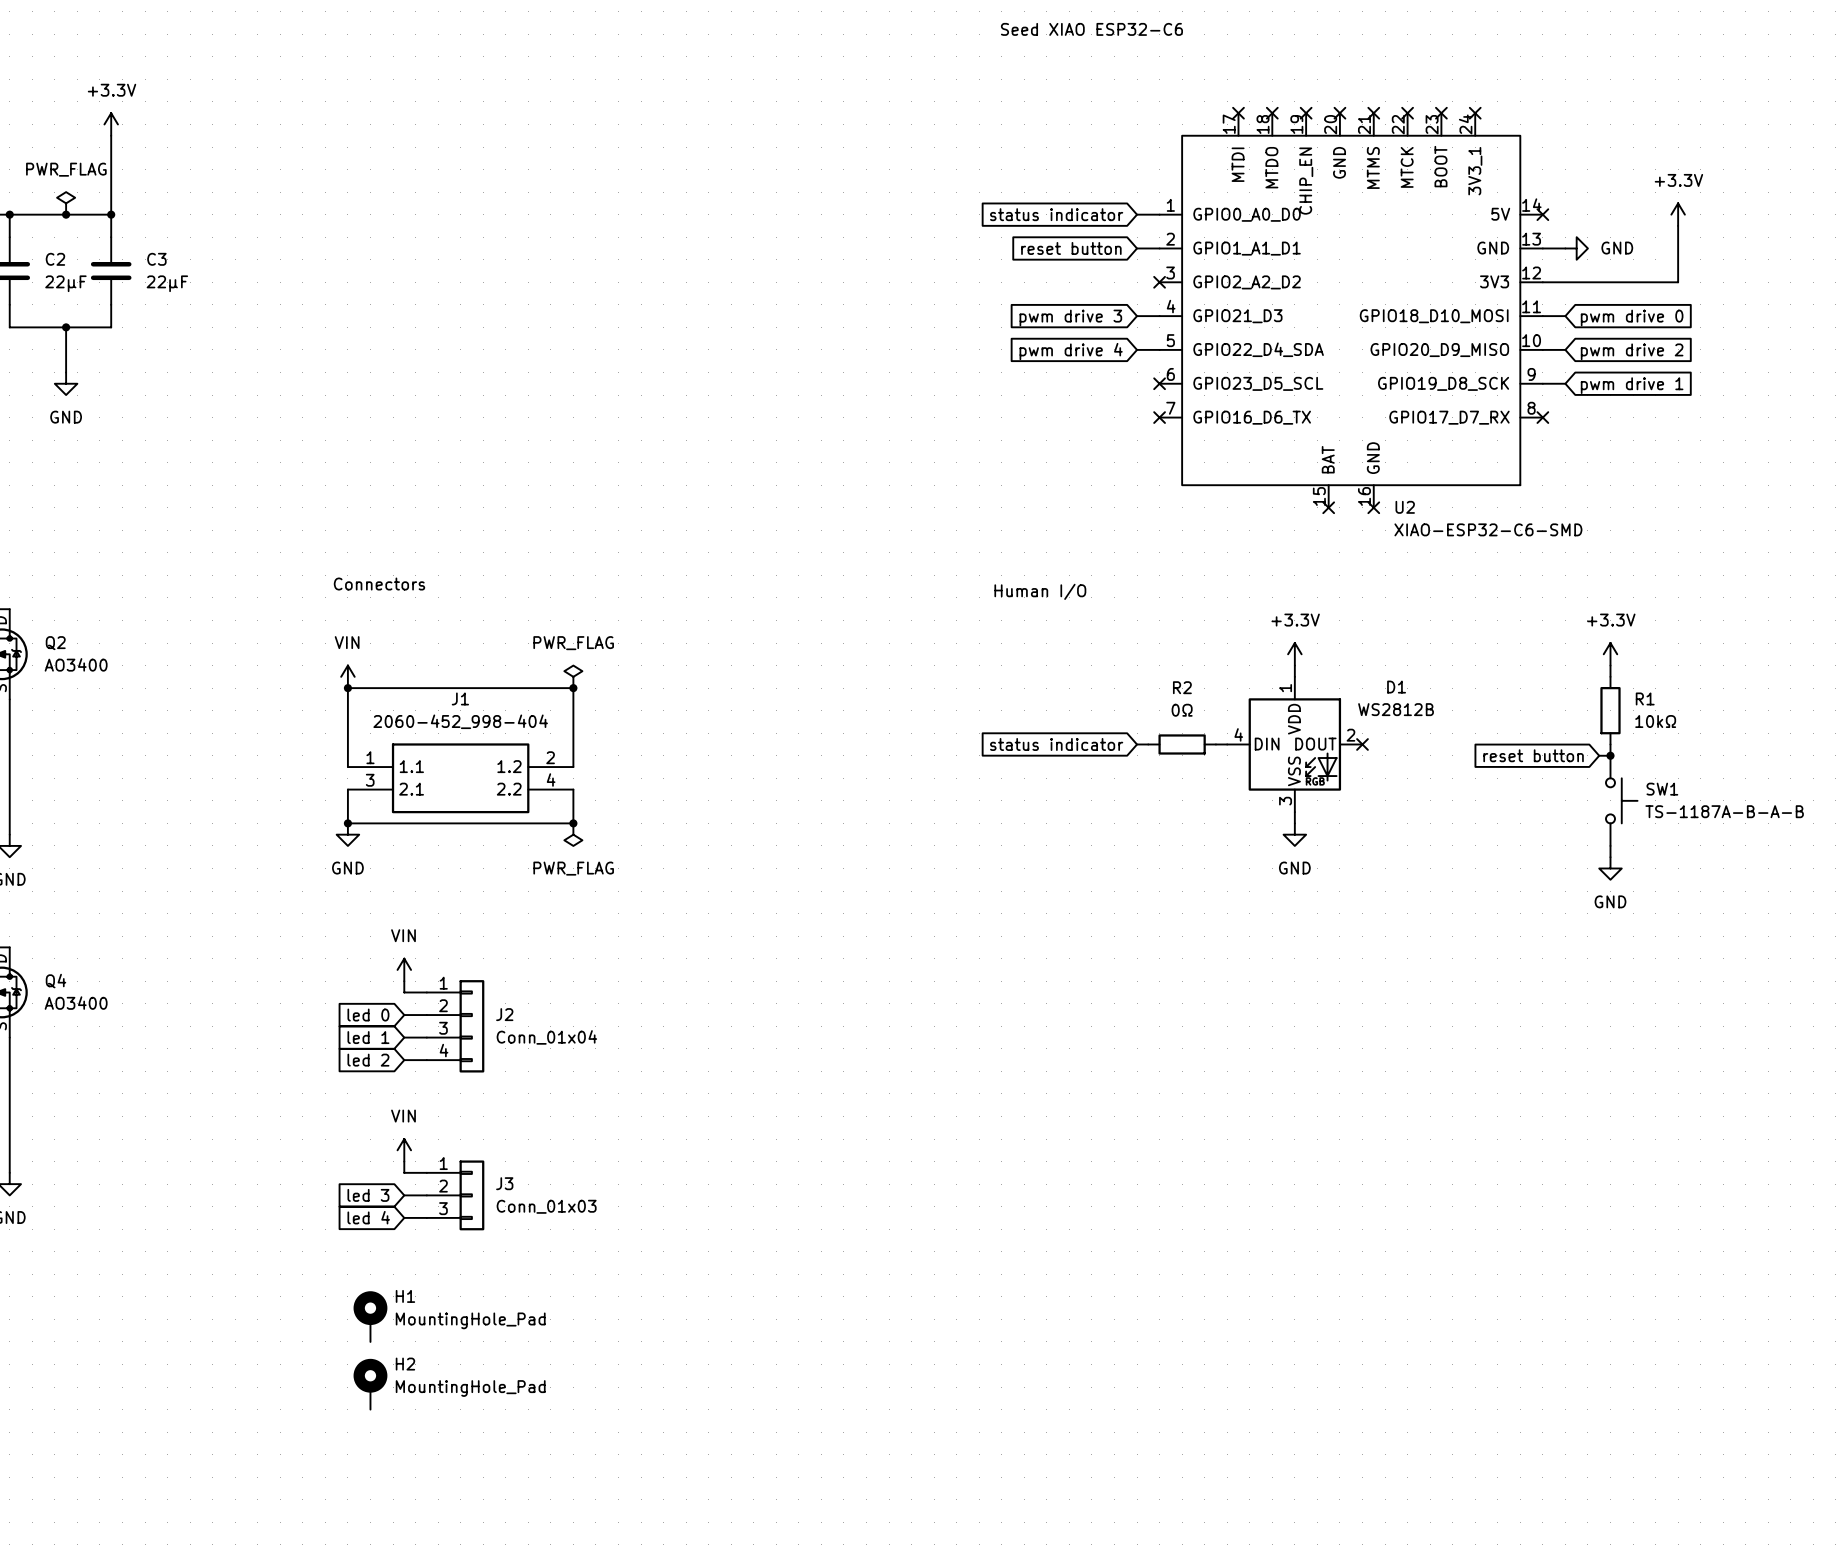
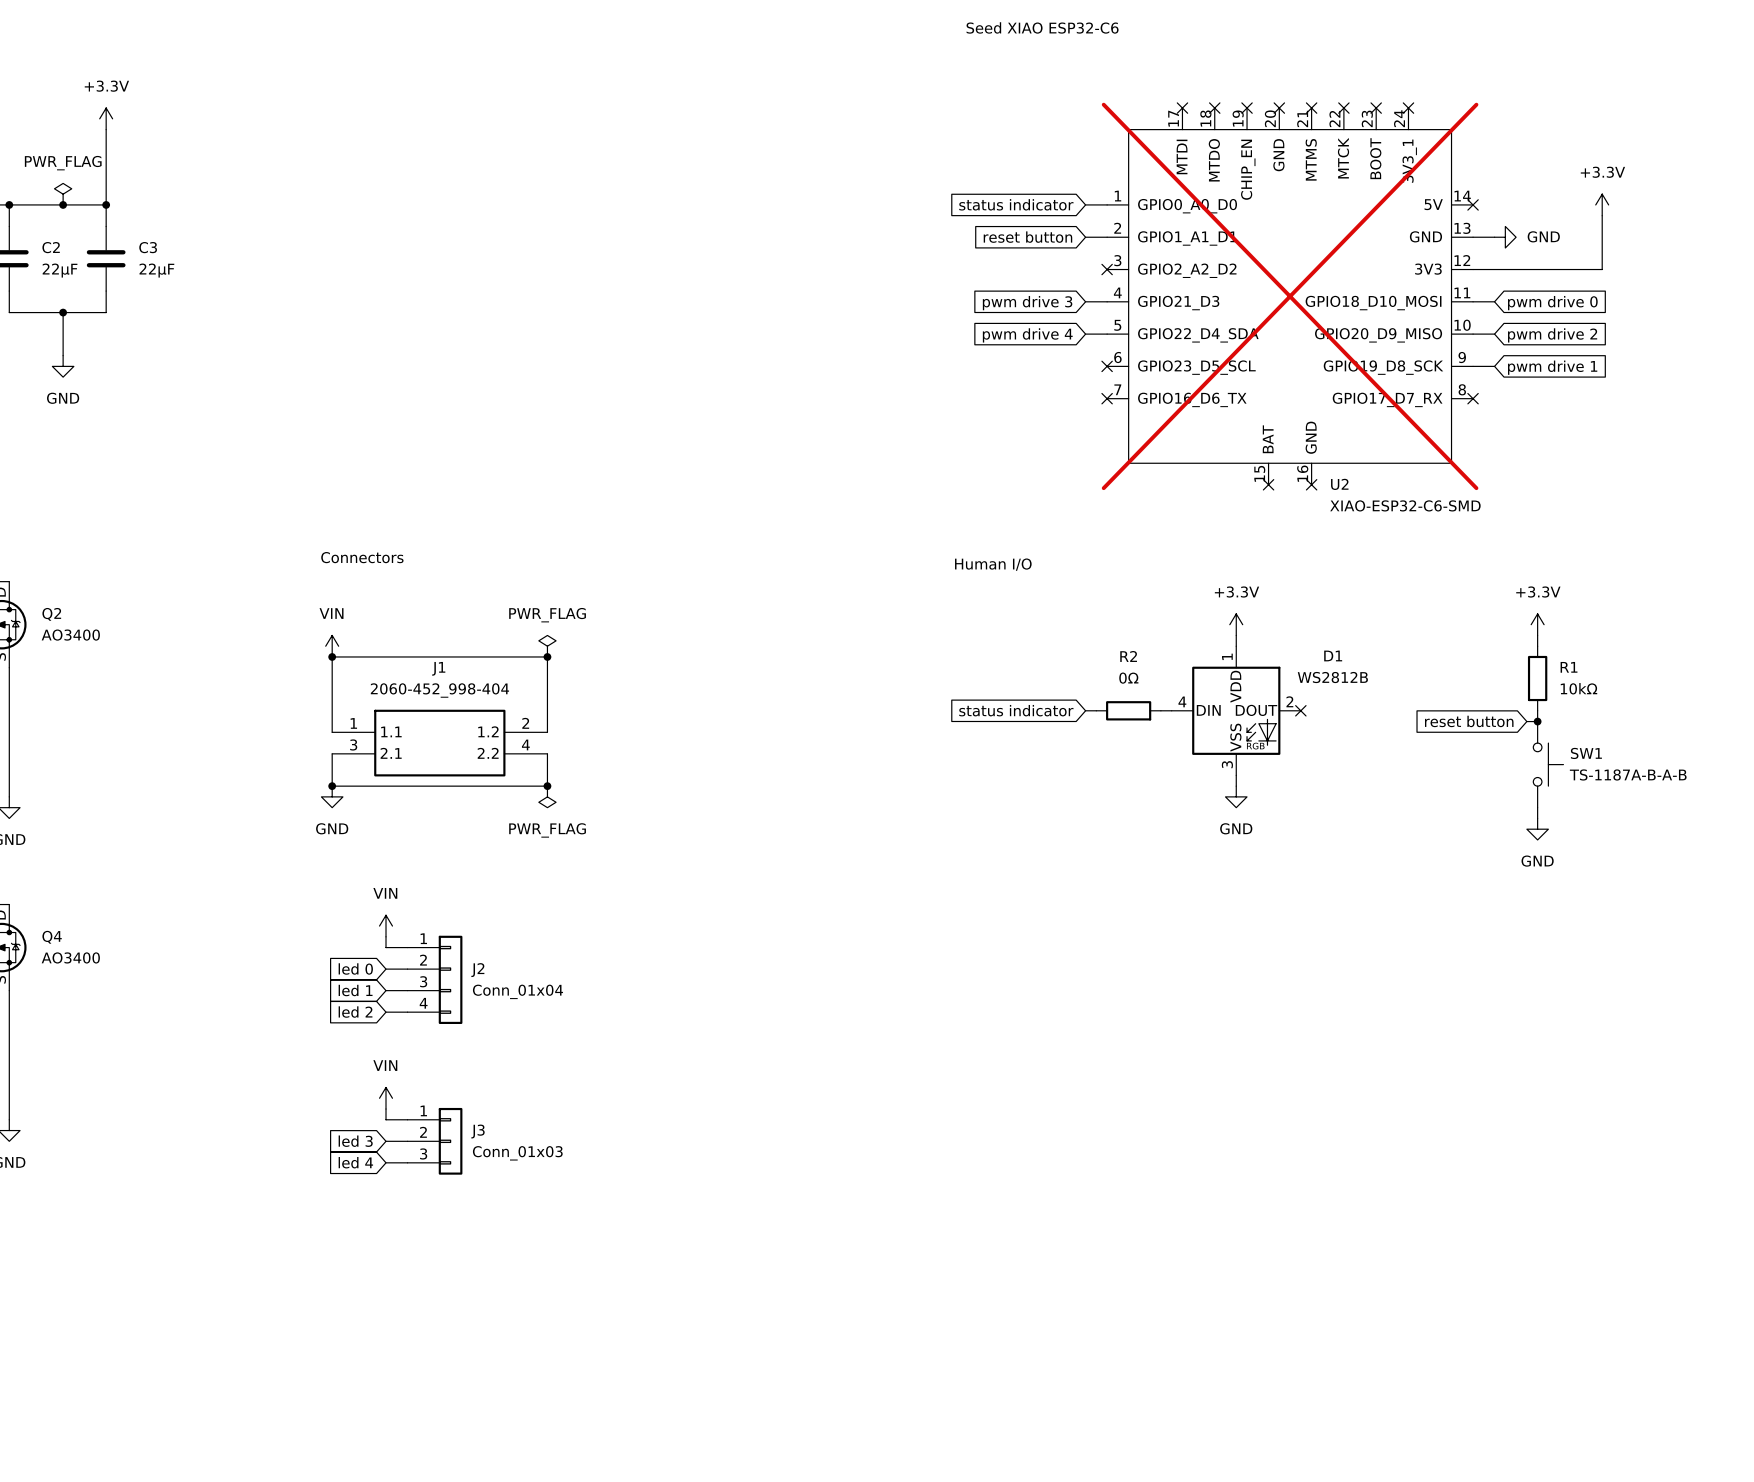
U2 do-not-place cross: none -> (1290, 296)
H1: MountingHole_Pad (370, 1316) -> none
H2: MountingHole_Pad (370, 1384) -> none

